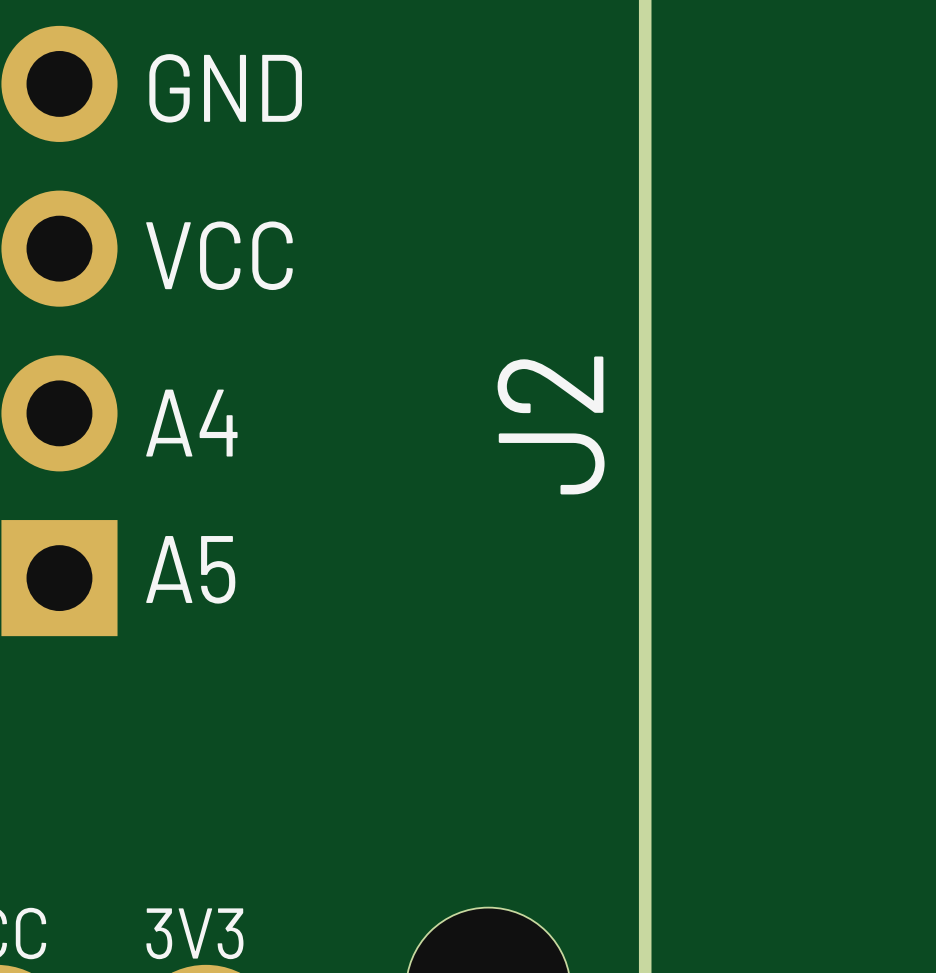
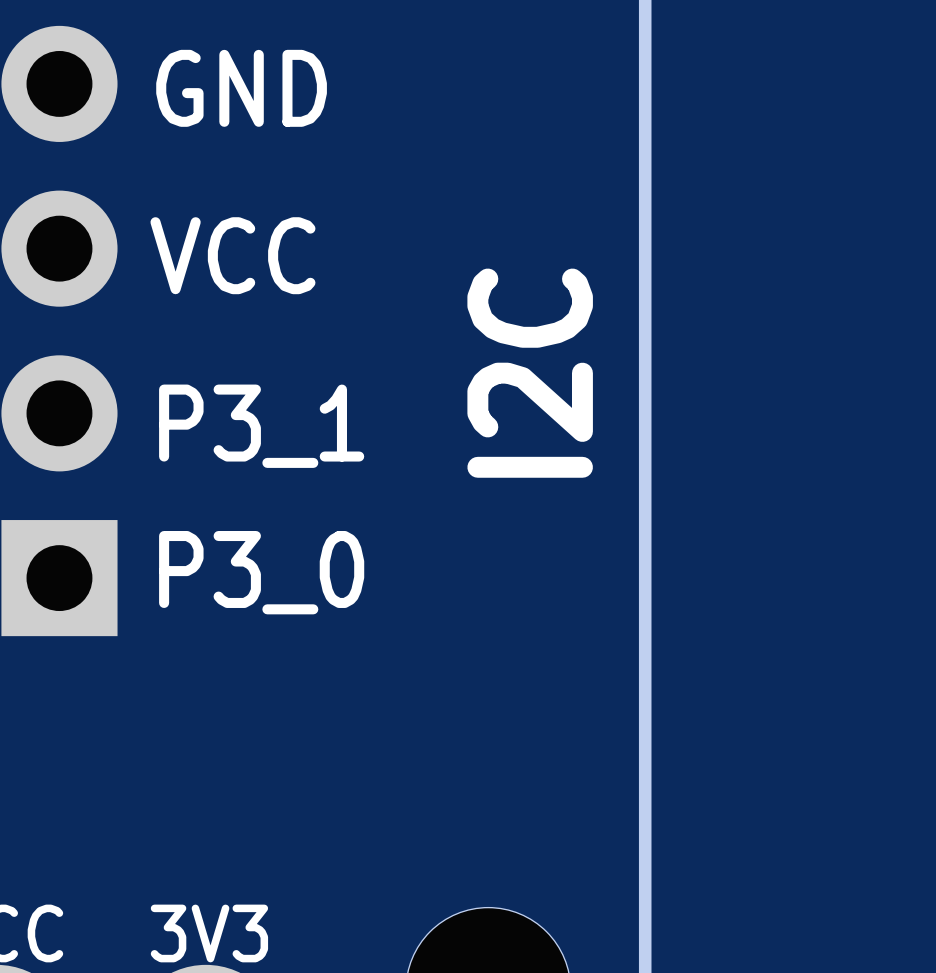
text: none -> I2C (530, 373)
text: A4 (191, 423) -> P3_1 (261, 426)
text: J2 (551, 425) -> none
text: A5 (190, 569) -> P3_0 (261, 572)

